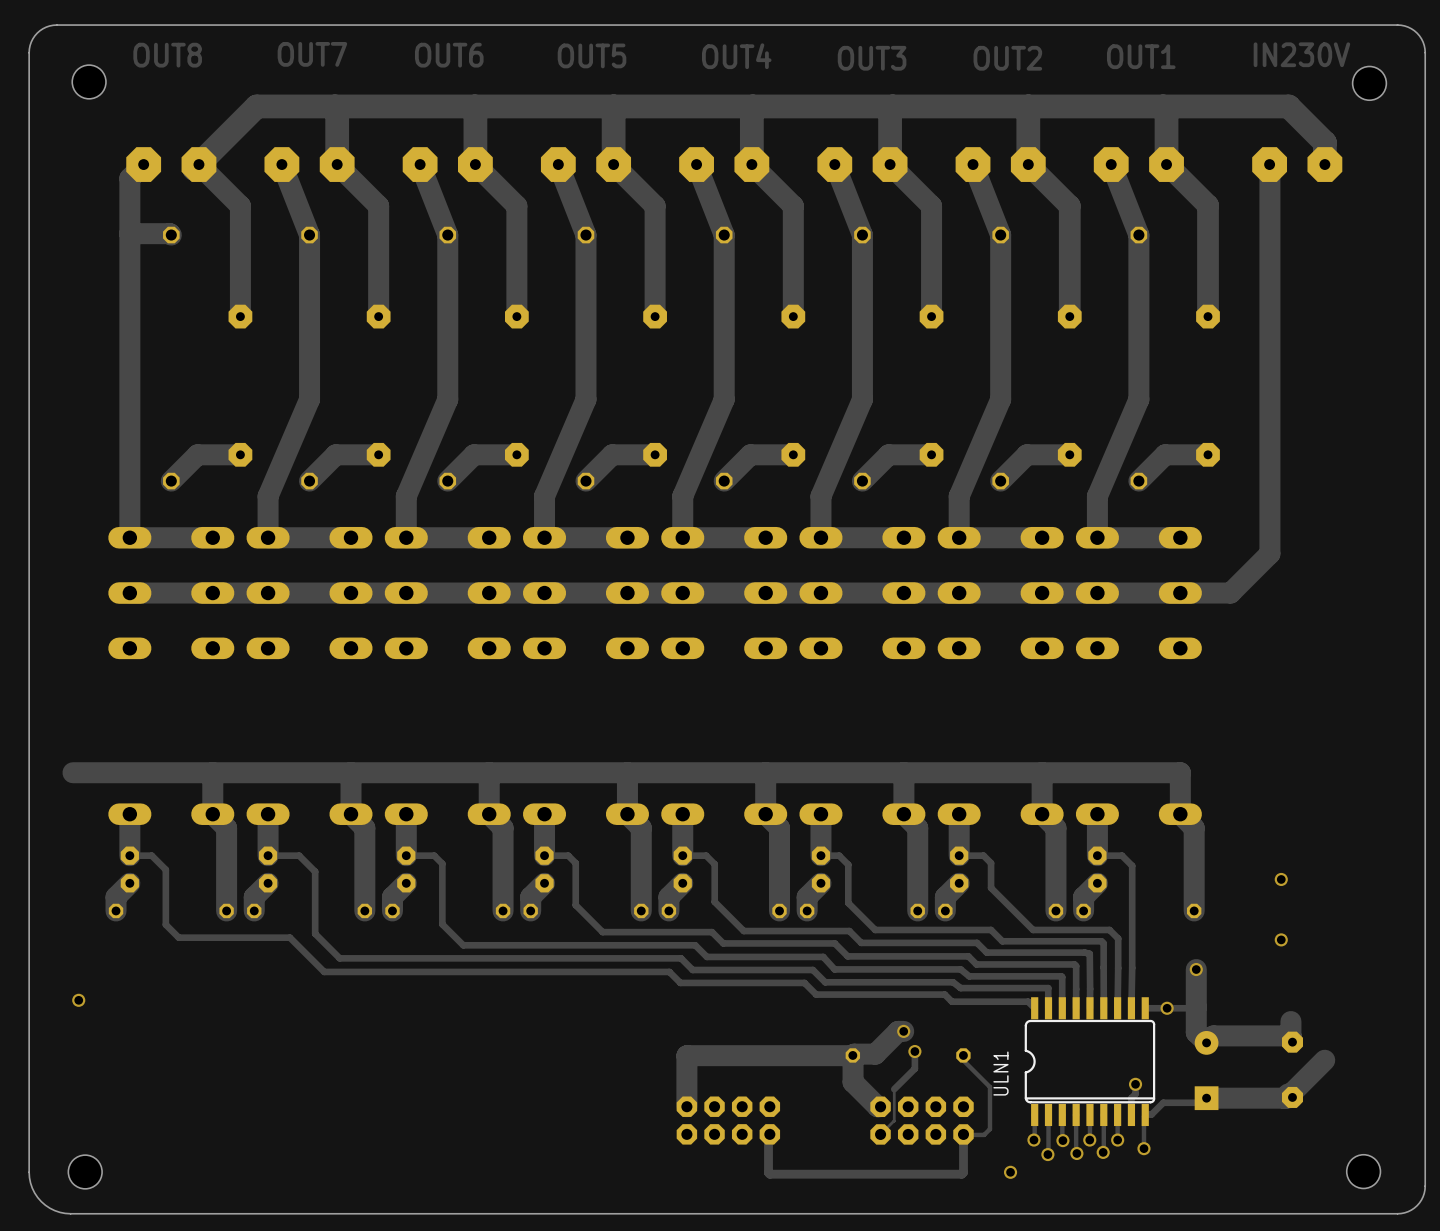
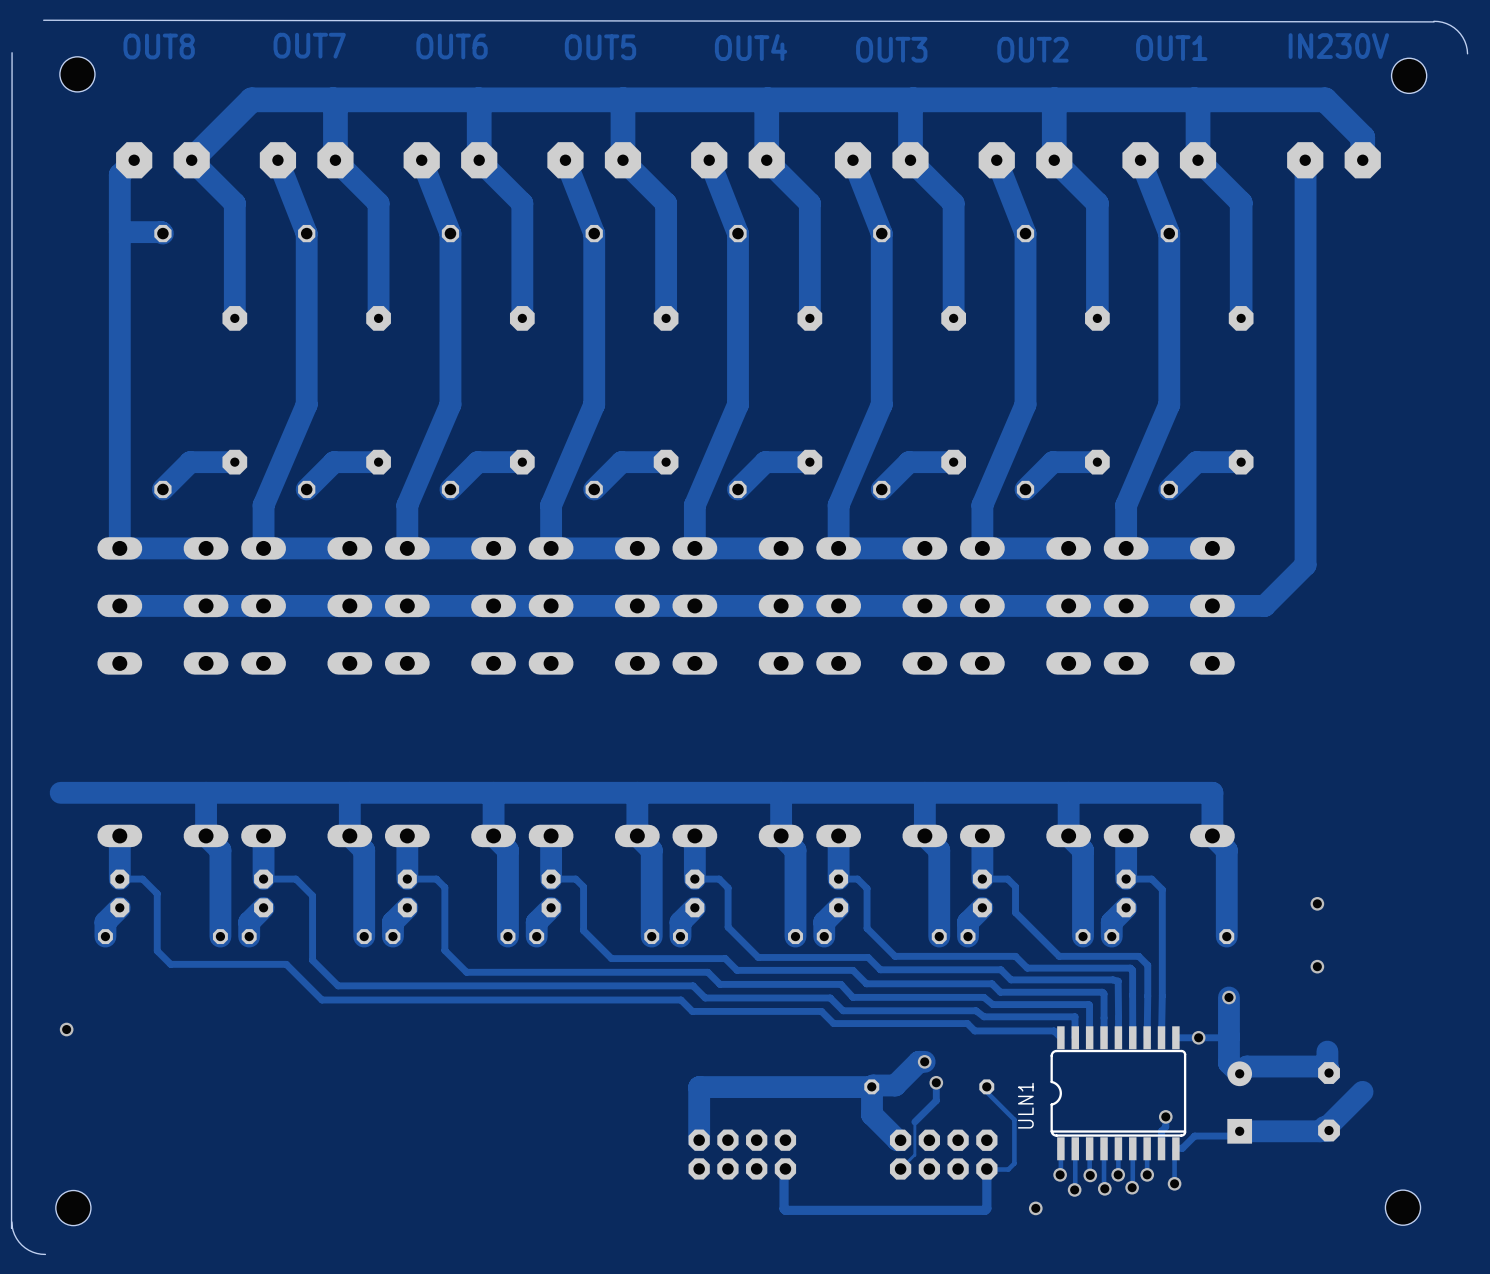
board edge: (1397, 25) (56, 25) (39, 30) (31, 42) (29, 52) (29, 1172) (30, 1183) (37, 1197) (49, 1208) (70, 1213) (1397, 1213) (1414, 1208) (1423, 1196) (1425, 1186) (1425, 52) (1423, 42) (1417, 33) (1408, 27) (1397, 25) -> none
board edge: none -> (43, 20) (1434, 21)
board edge: none -> (1433, 21) (1446, 23) (1457, 30) (1464, 41) (1467, 53)
board edge: none -> (12, 52) (11, 1228)
board edge: none -> (11, 1221) (14, 1234) (21, 1245) (32, 1252) (45, 1254)

